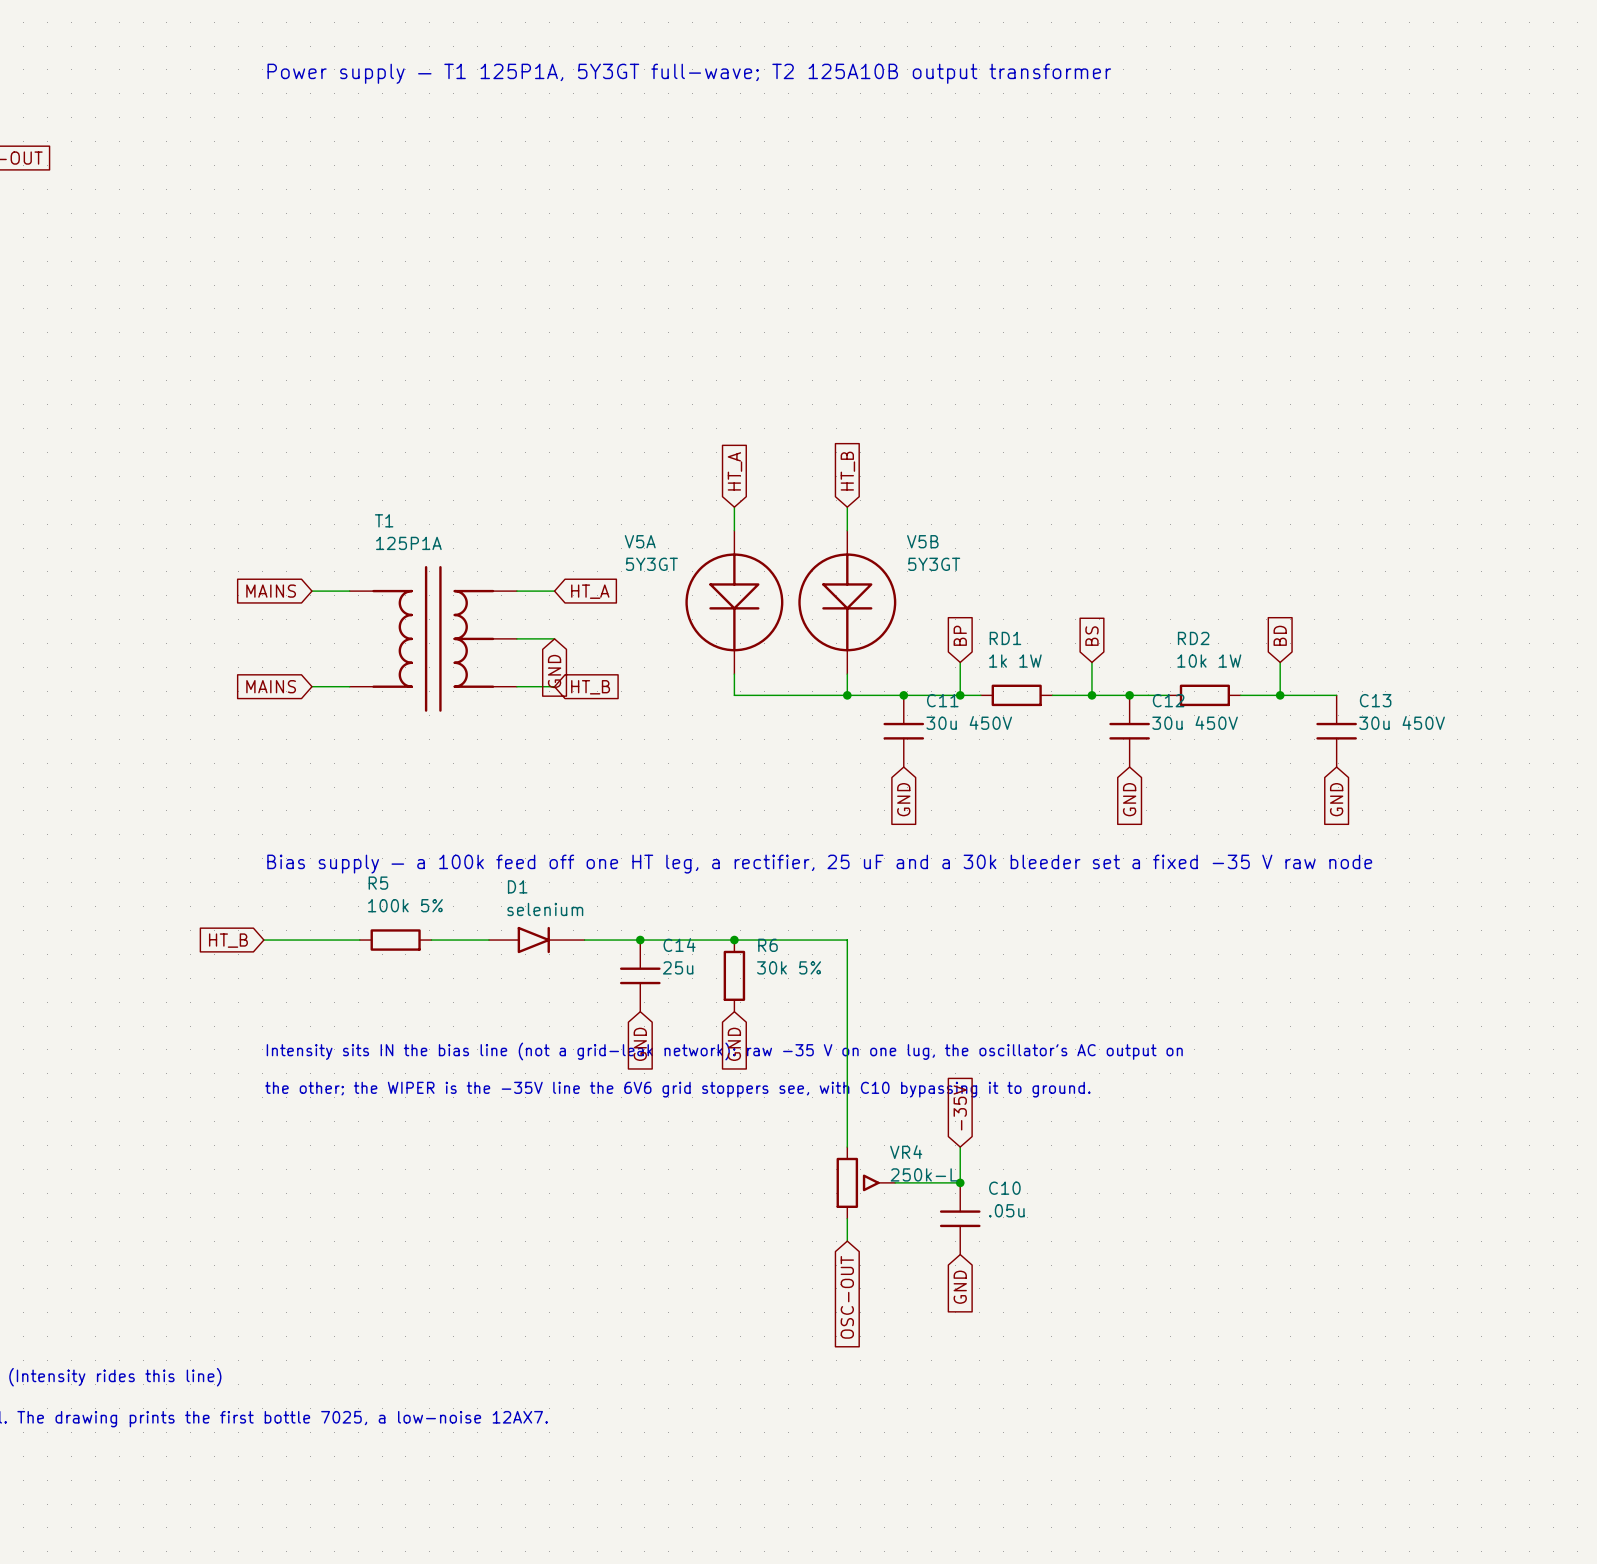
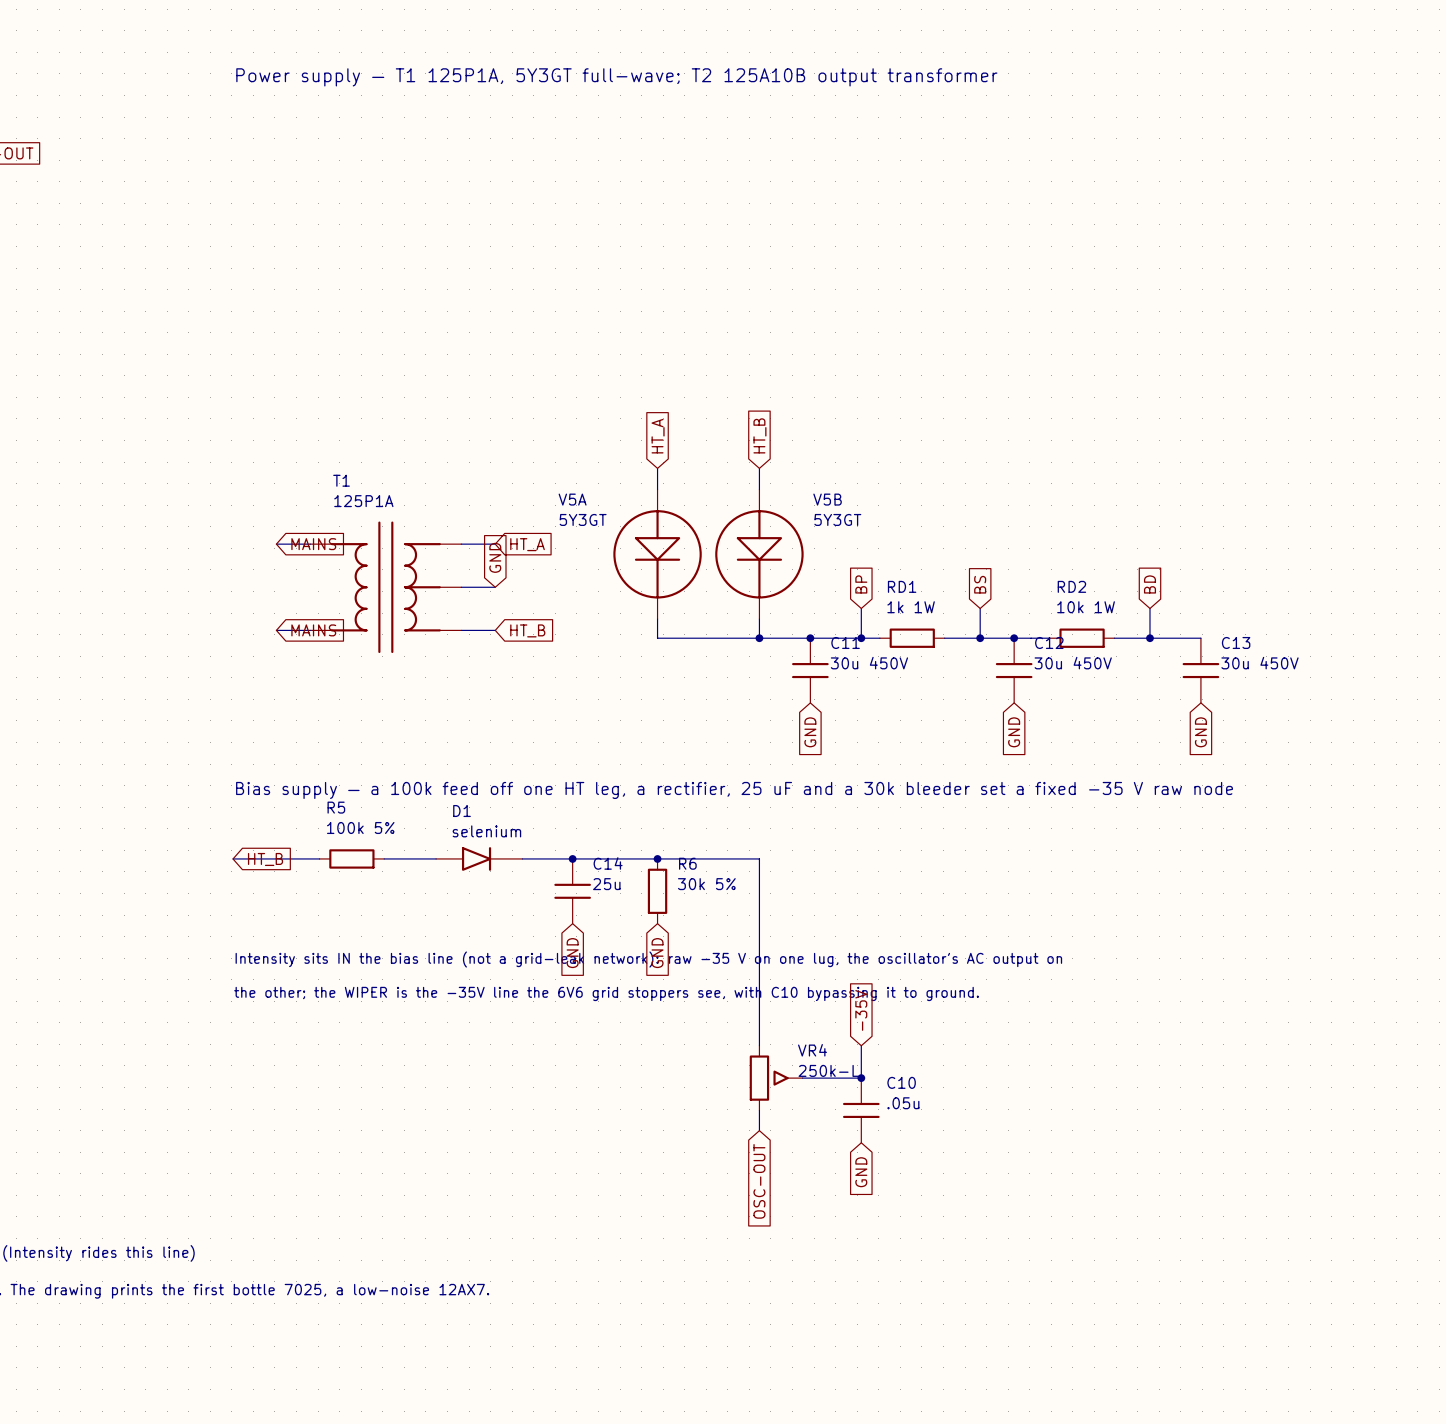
global label rotation: 0° (271, 591) -> 180° (313, 544)
global label rotation: 0° (554, 671) -> 180° (495, 557)
global label rotation: 0° (271, 686) -> 180° (313, 630)
global label rotation: 0° (228, 940) -> 180° (265, 859)

